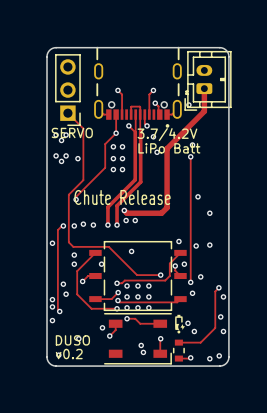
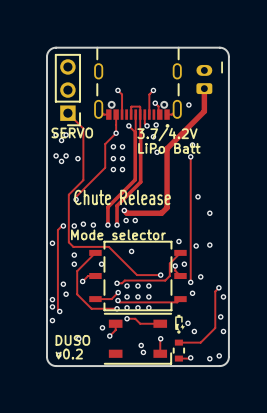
part footprint: [184, 51, 232, 111] -> [196, 64, 213, 95]
text: none -> - (222, 67)
via: none -> (156, 125)
text: none -> Mode selector (118, 234)

